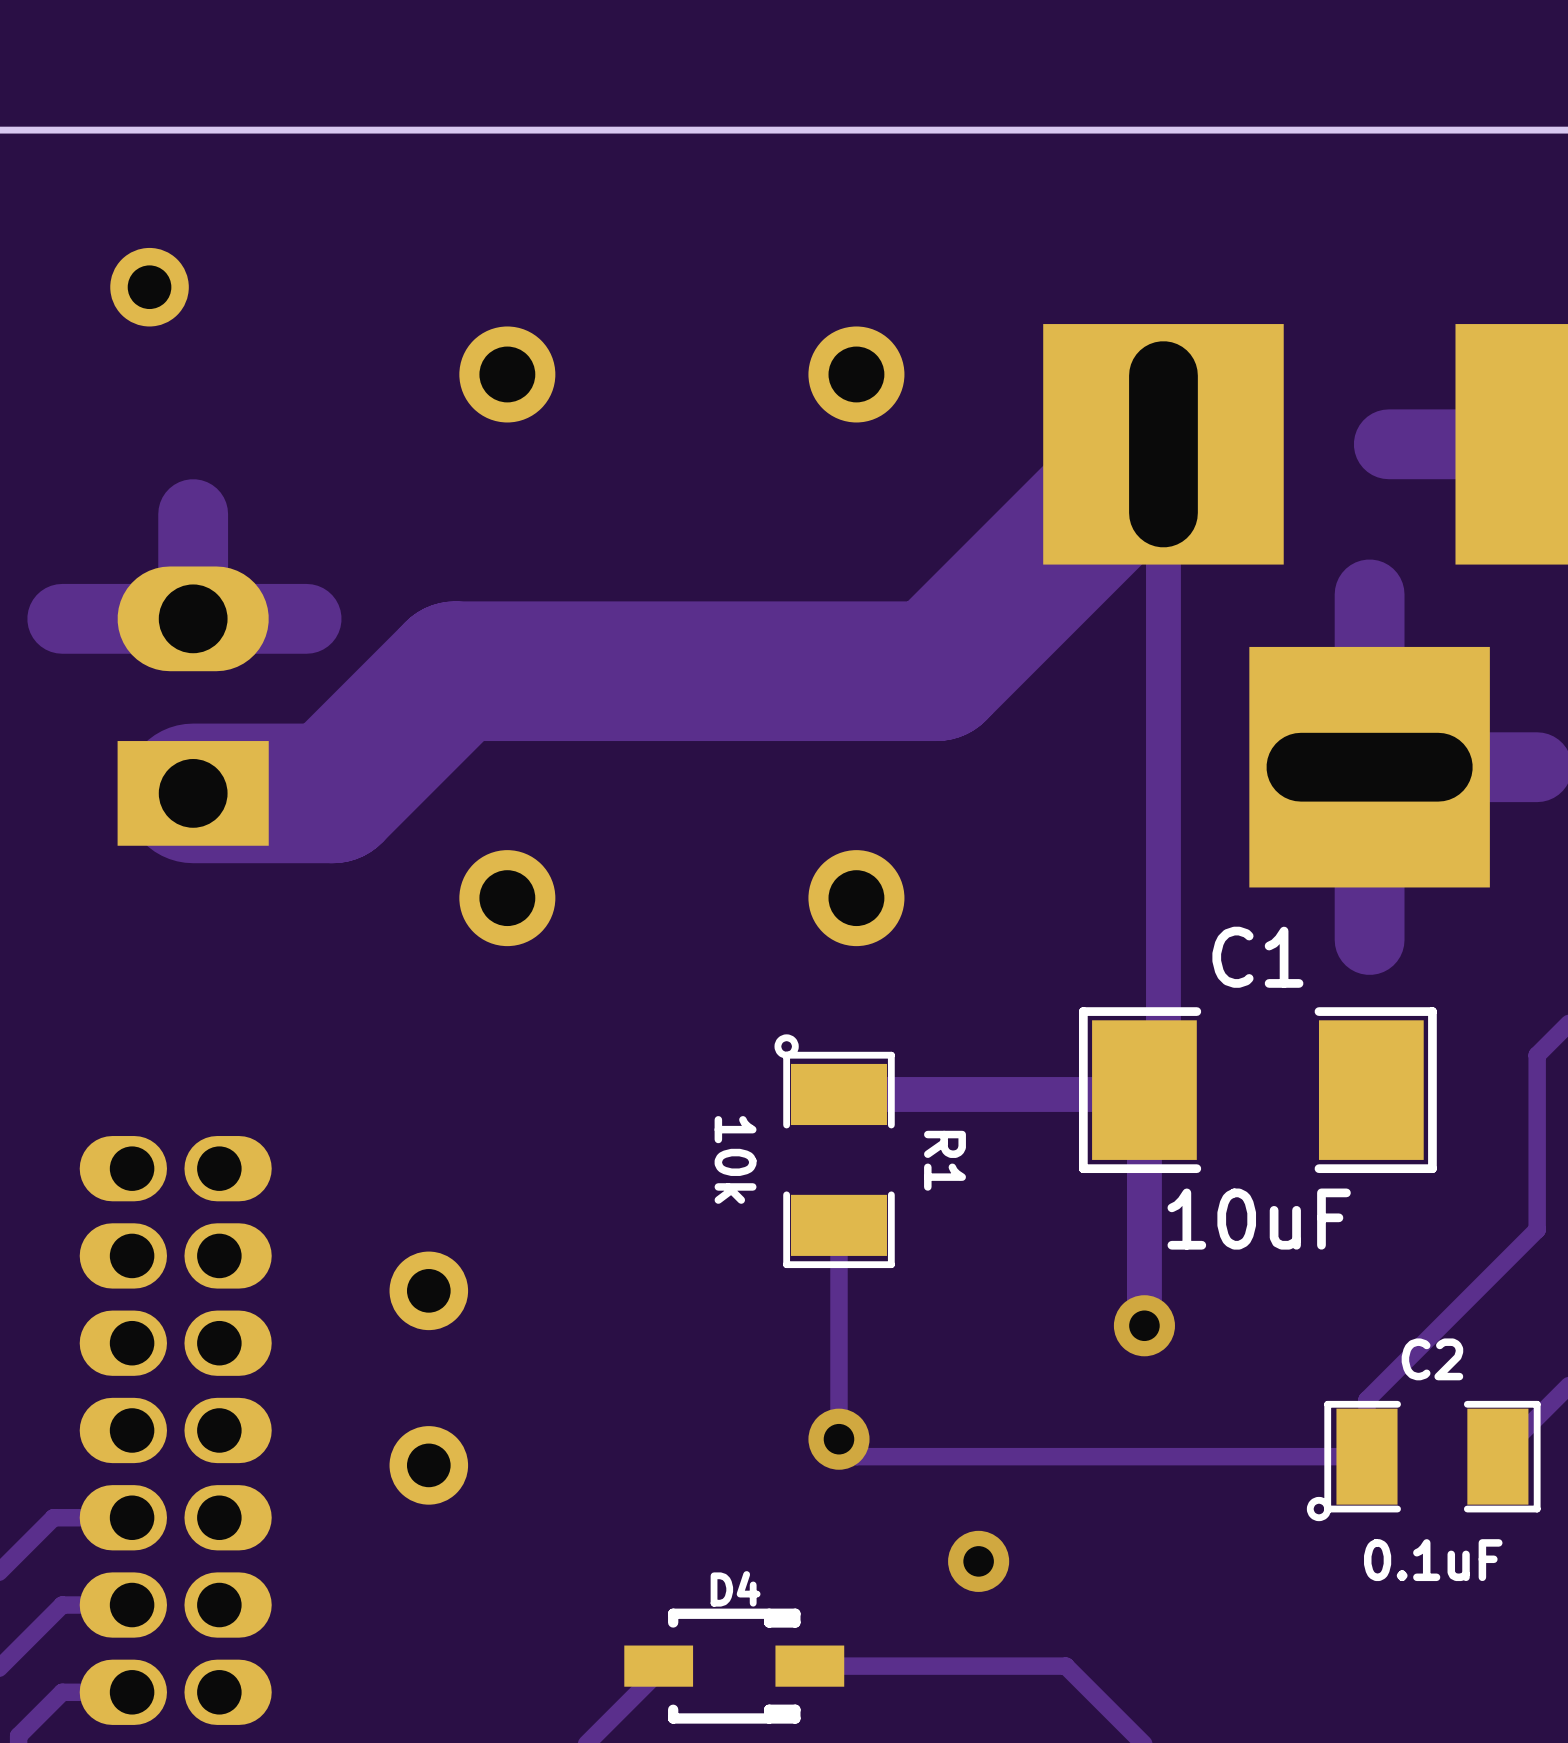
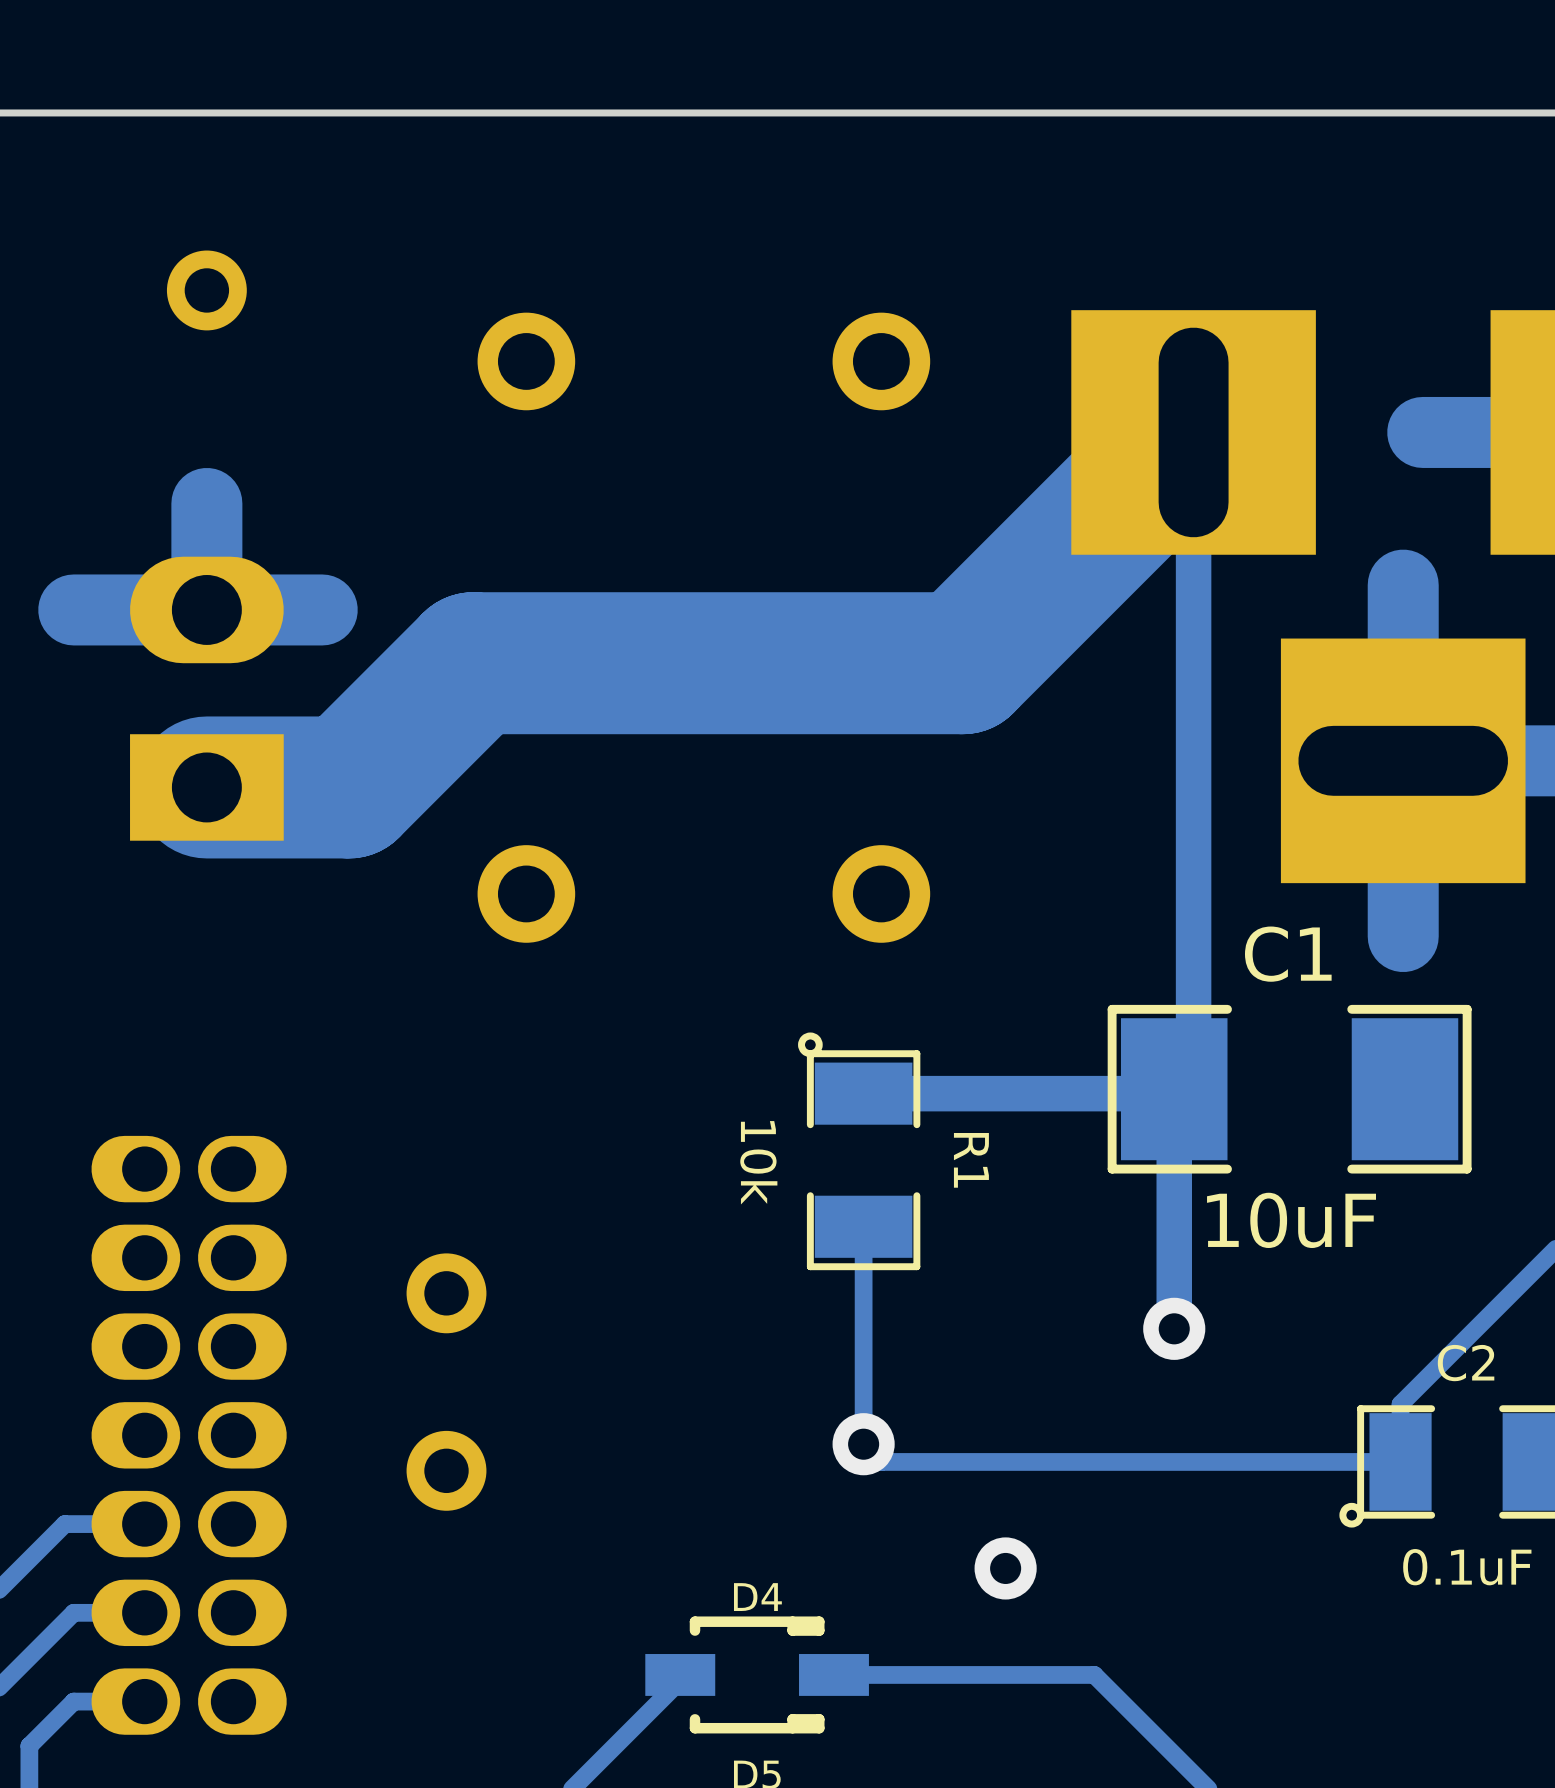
part position: (149, 287) -> (206, 290)

